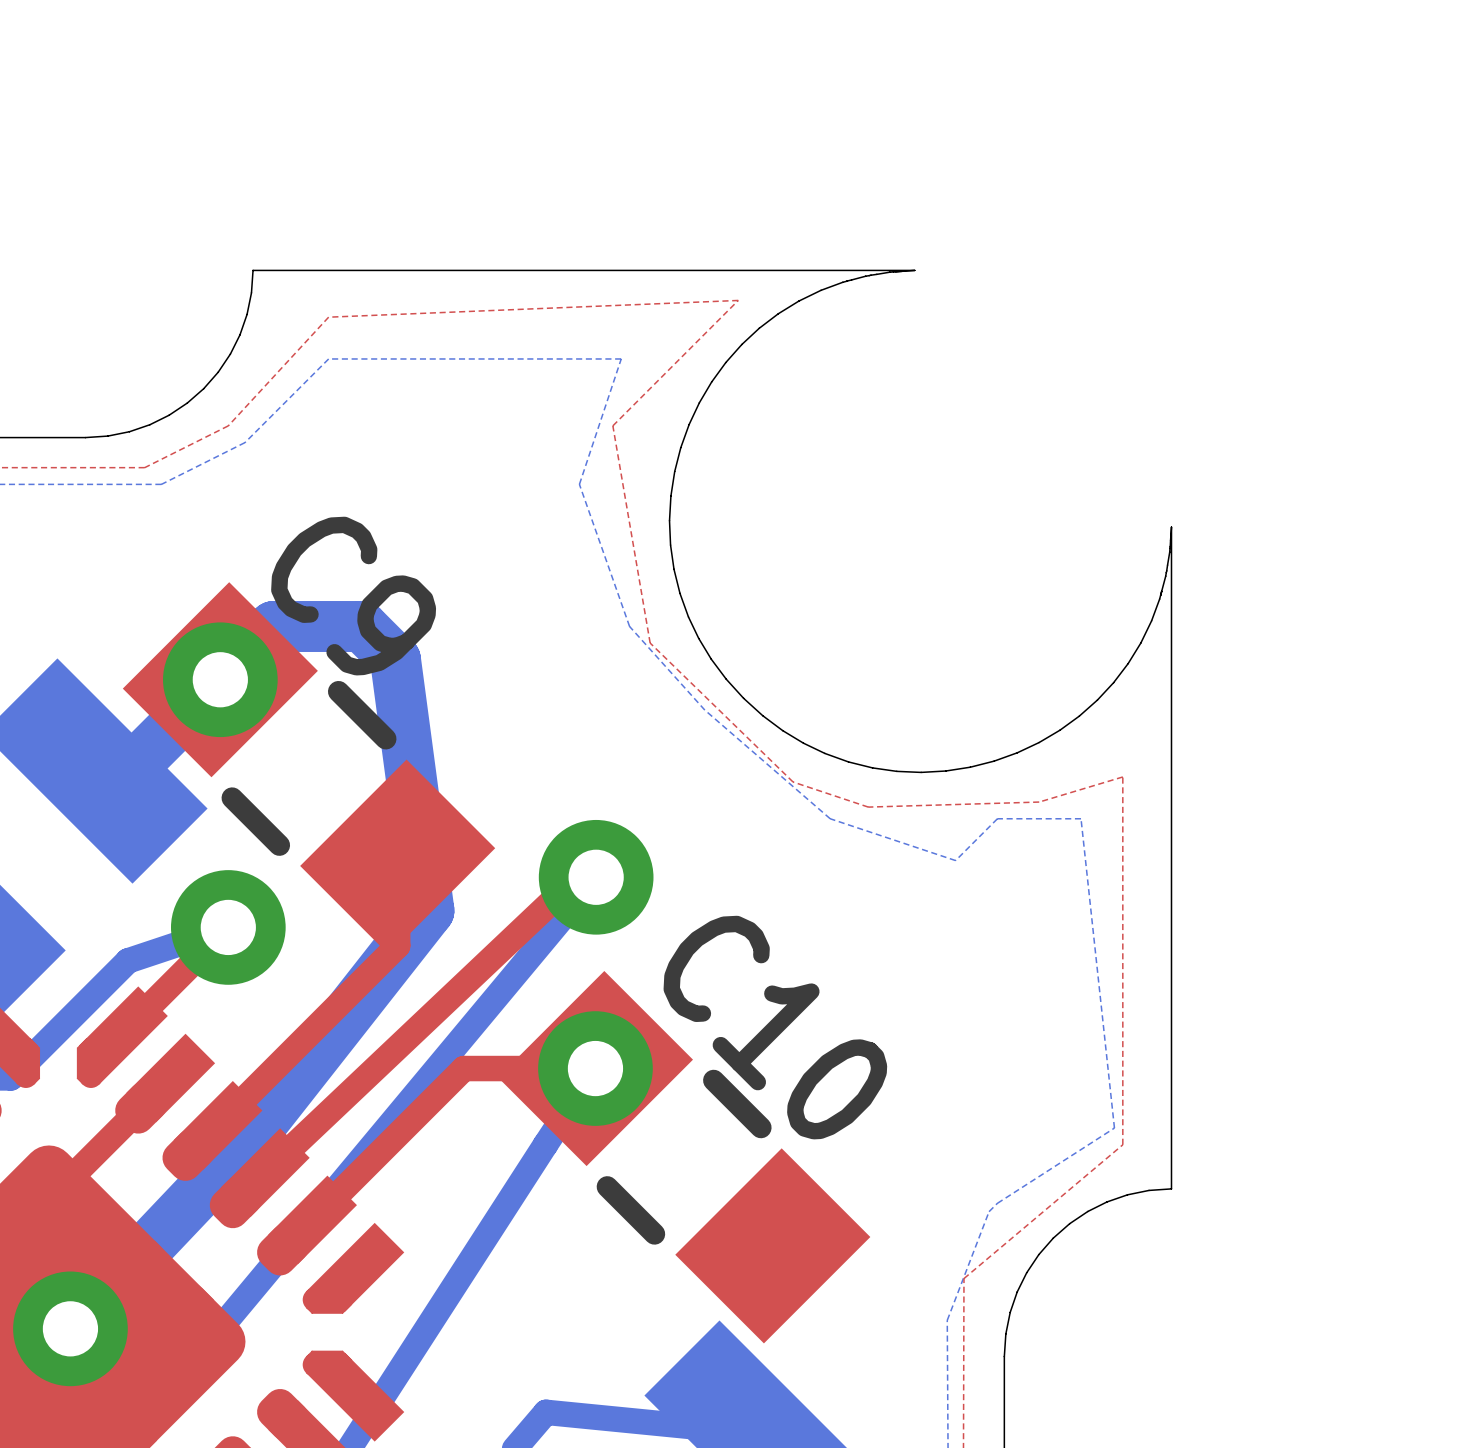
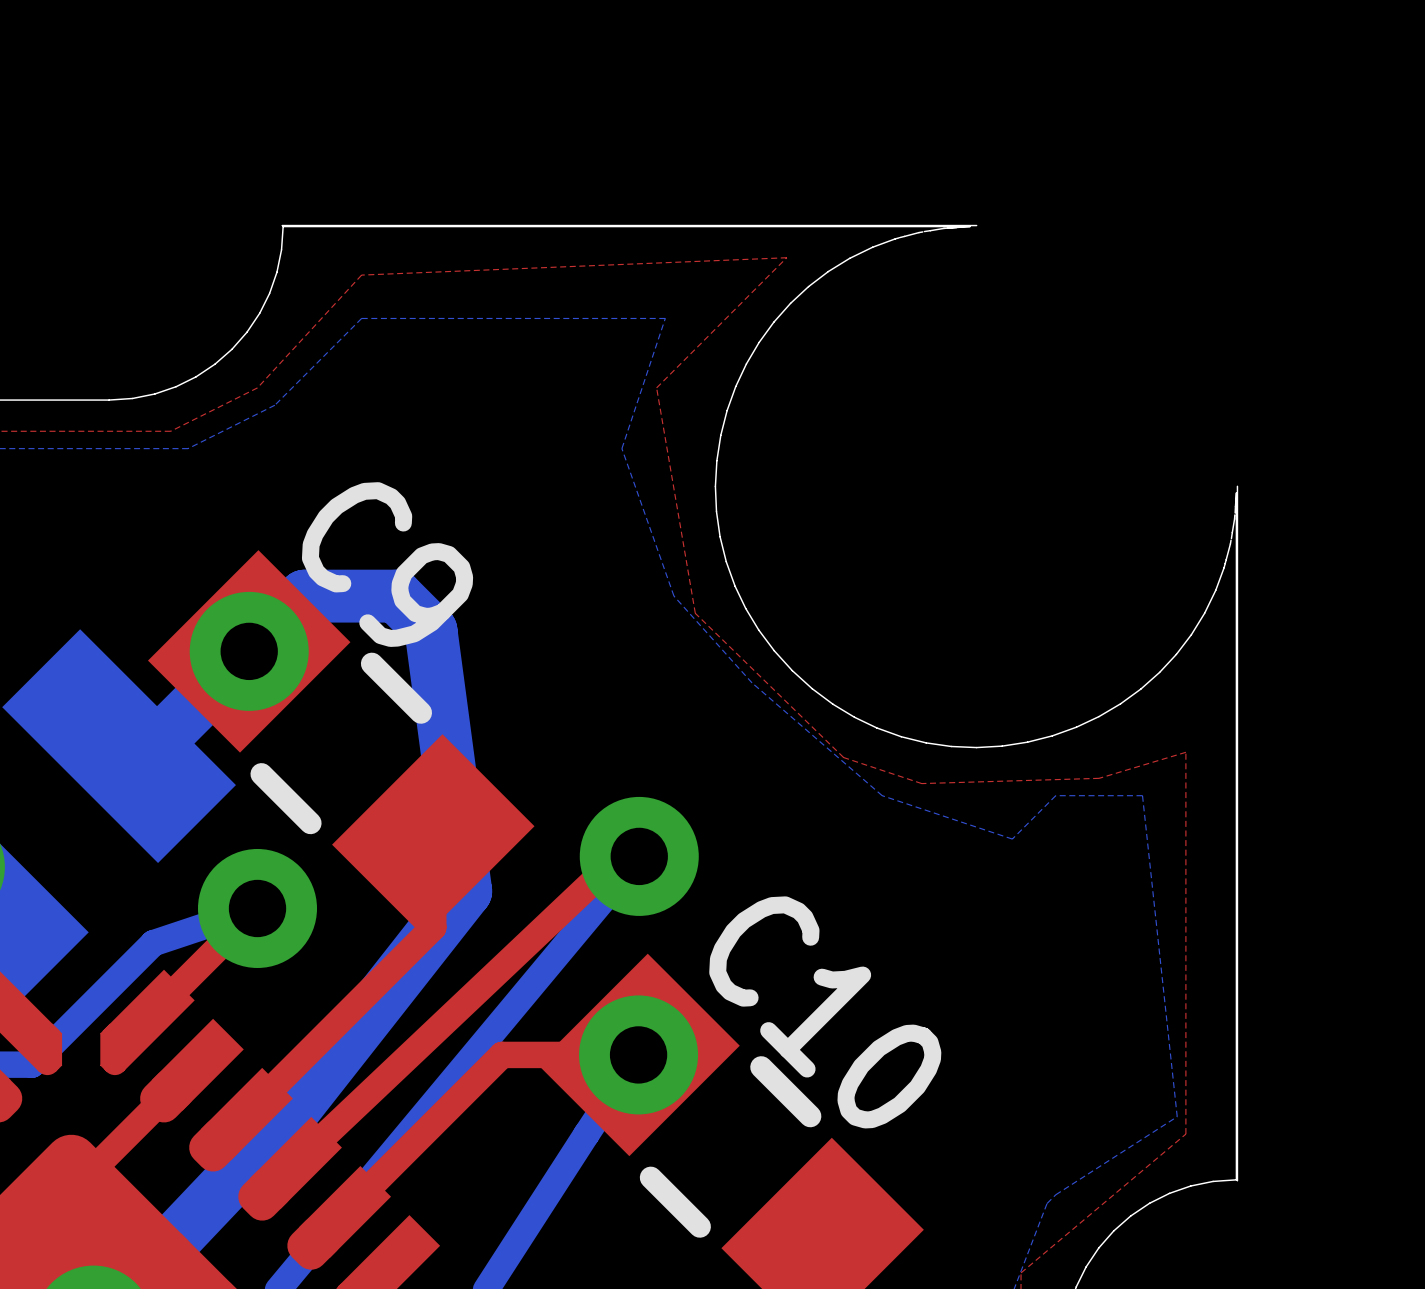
board edge: none -> (282, 225) (976, 225)
board edge: none -> (1237, 486) (1237, 1180)

